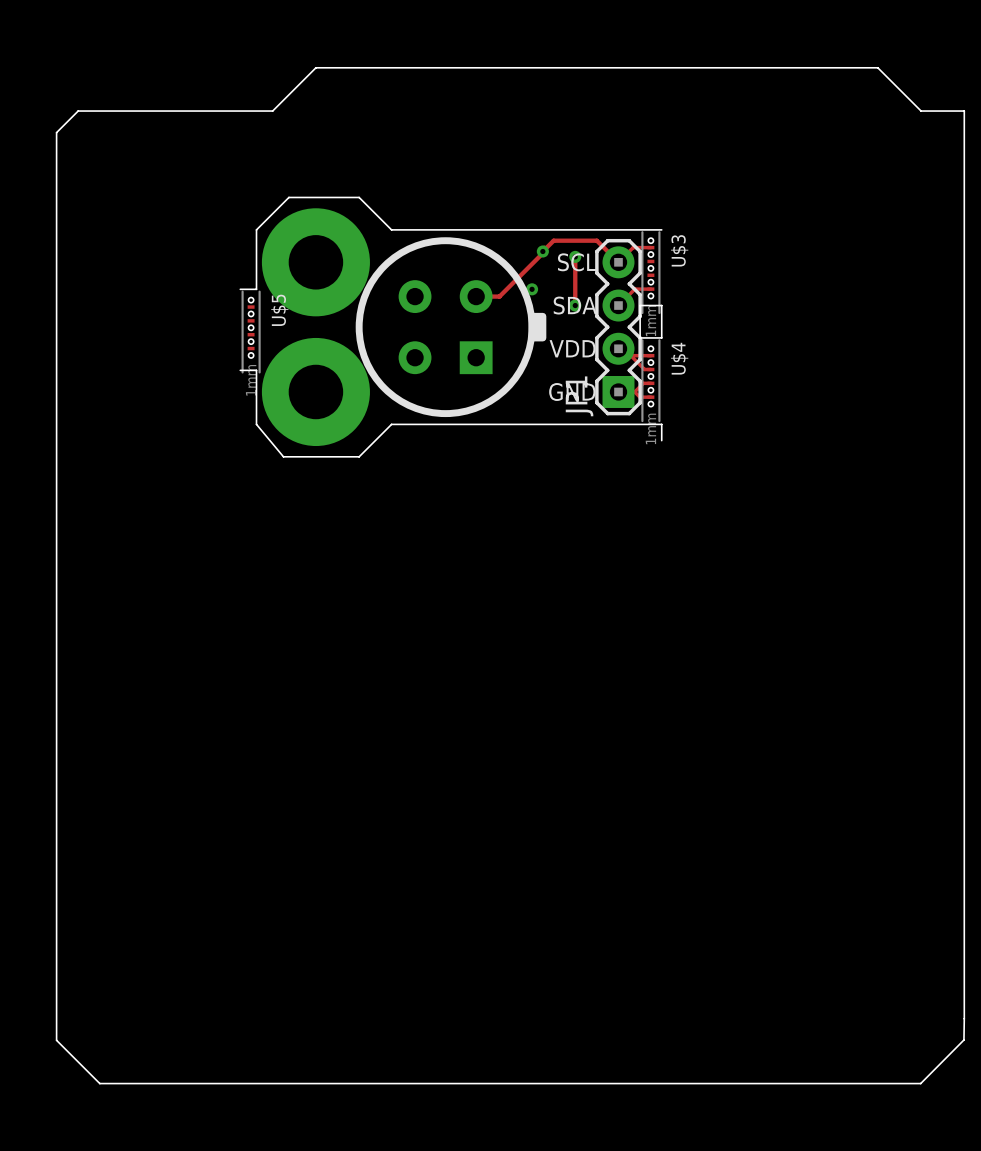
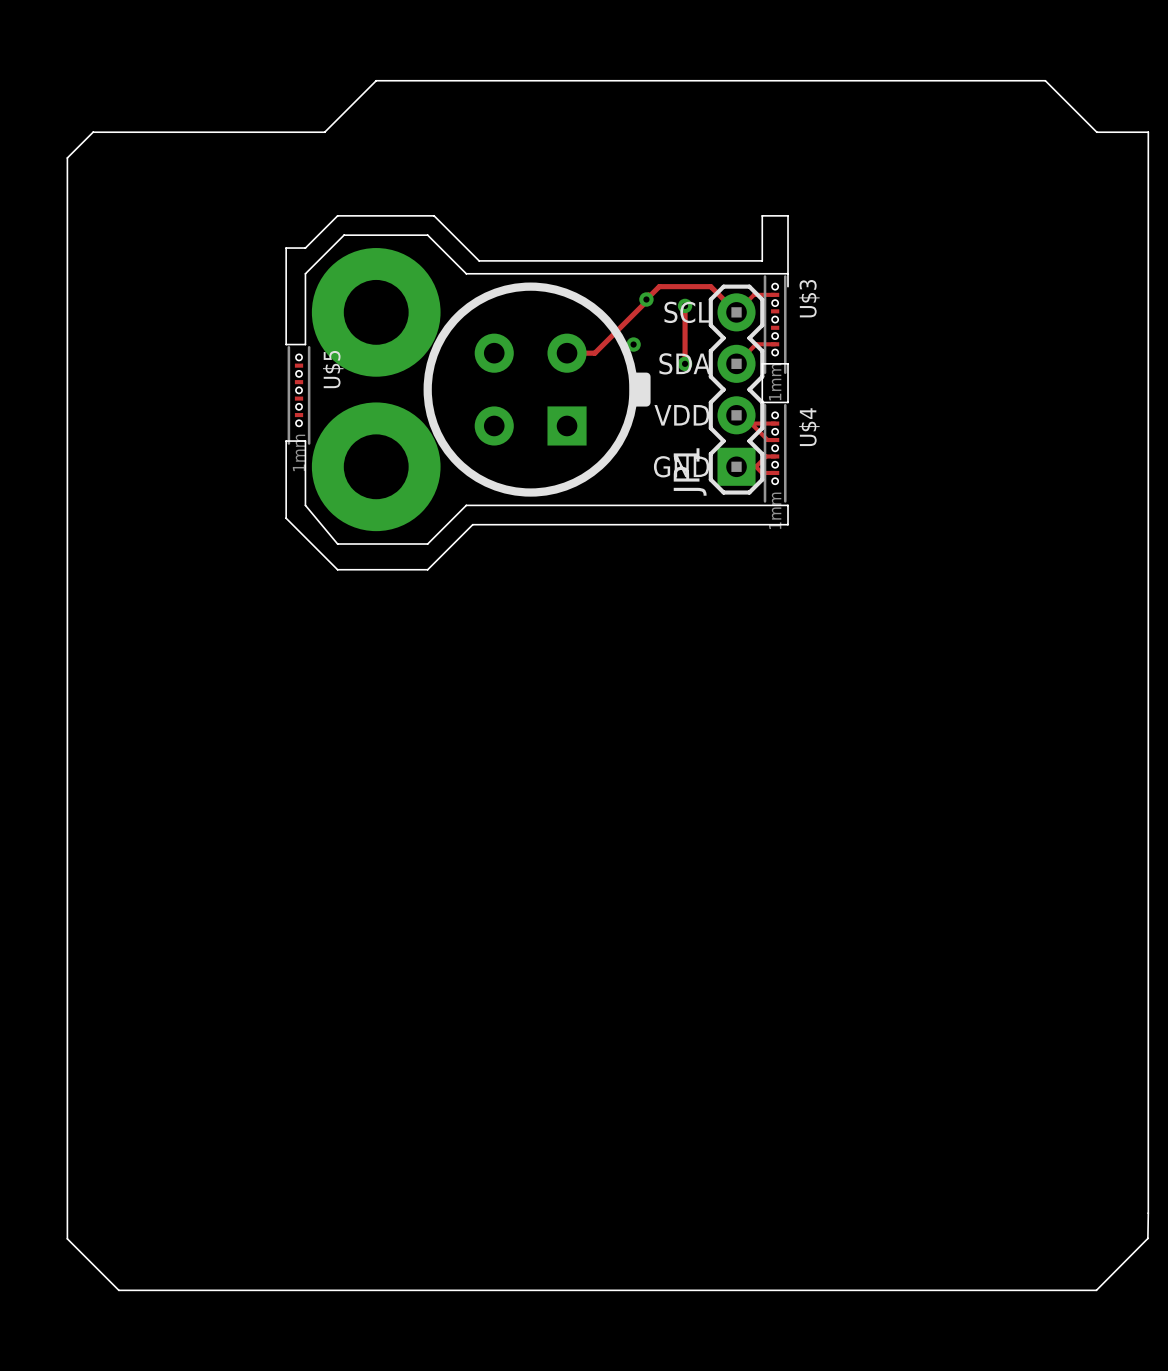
board edge: none -> (788, 286) (788, 215) (762, 215) (762, 260) (479, 260) (434, 215) (337, 215) (305, 248) (286, 248) (286, 344)
board edge: none -> (286, 441) (286, 518) (337, 569) (427, 569) (472, 524) (788, 524)

